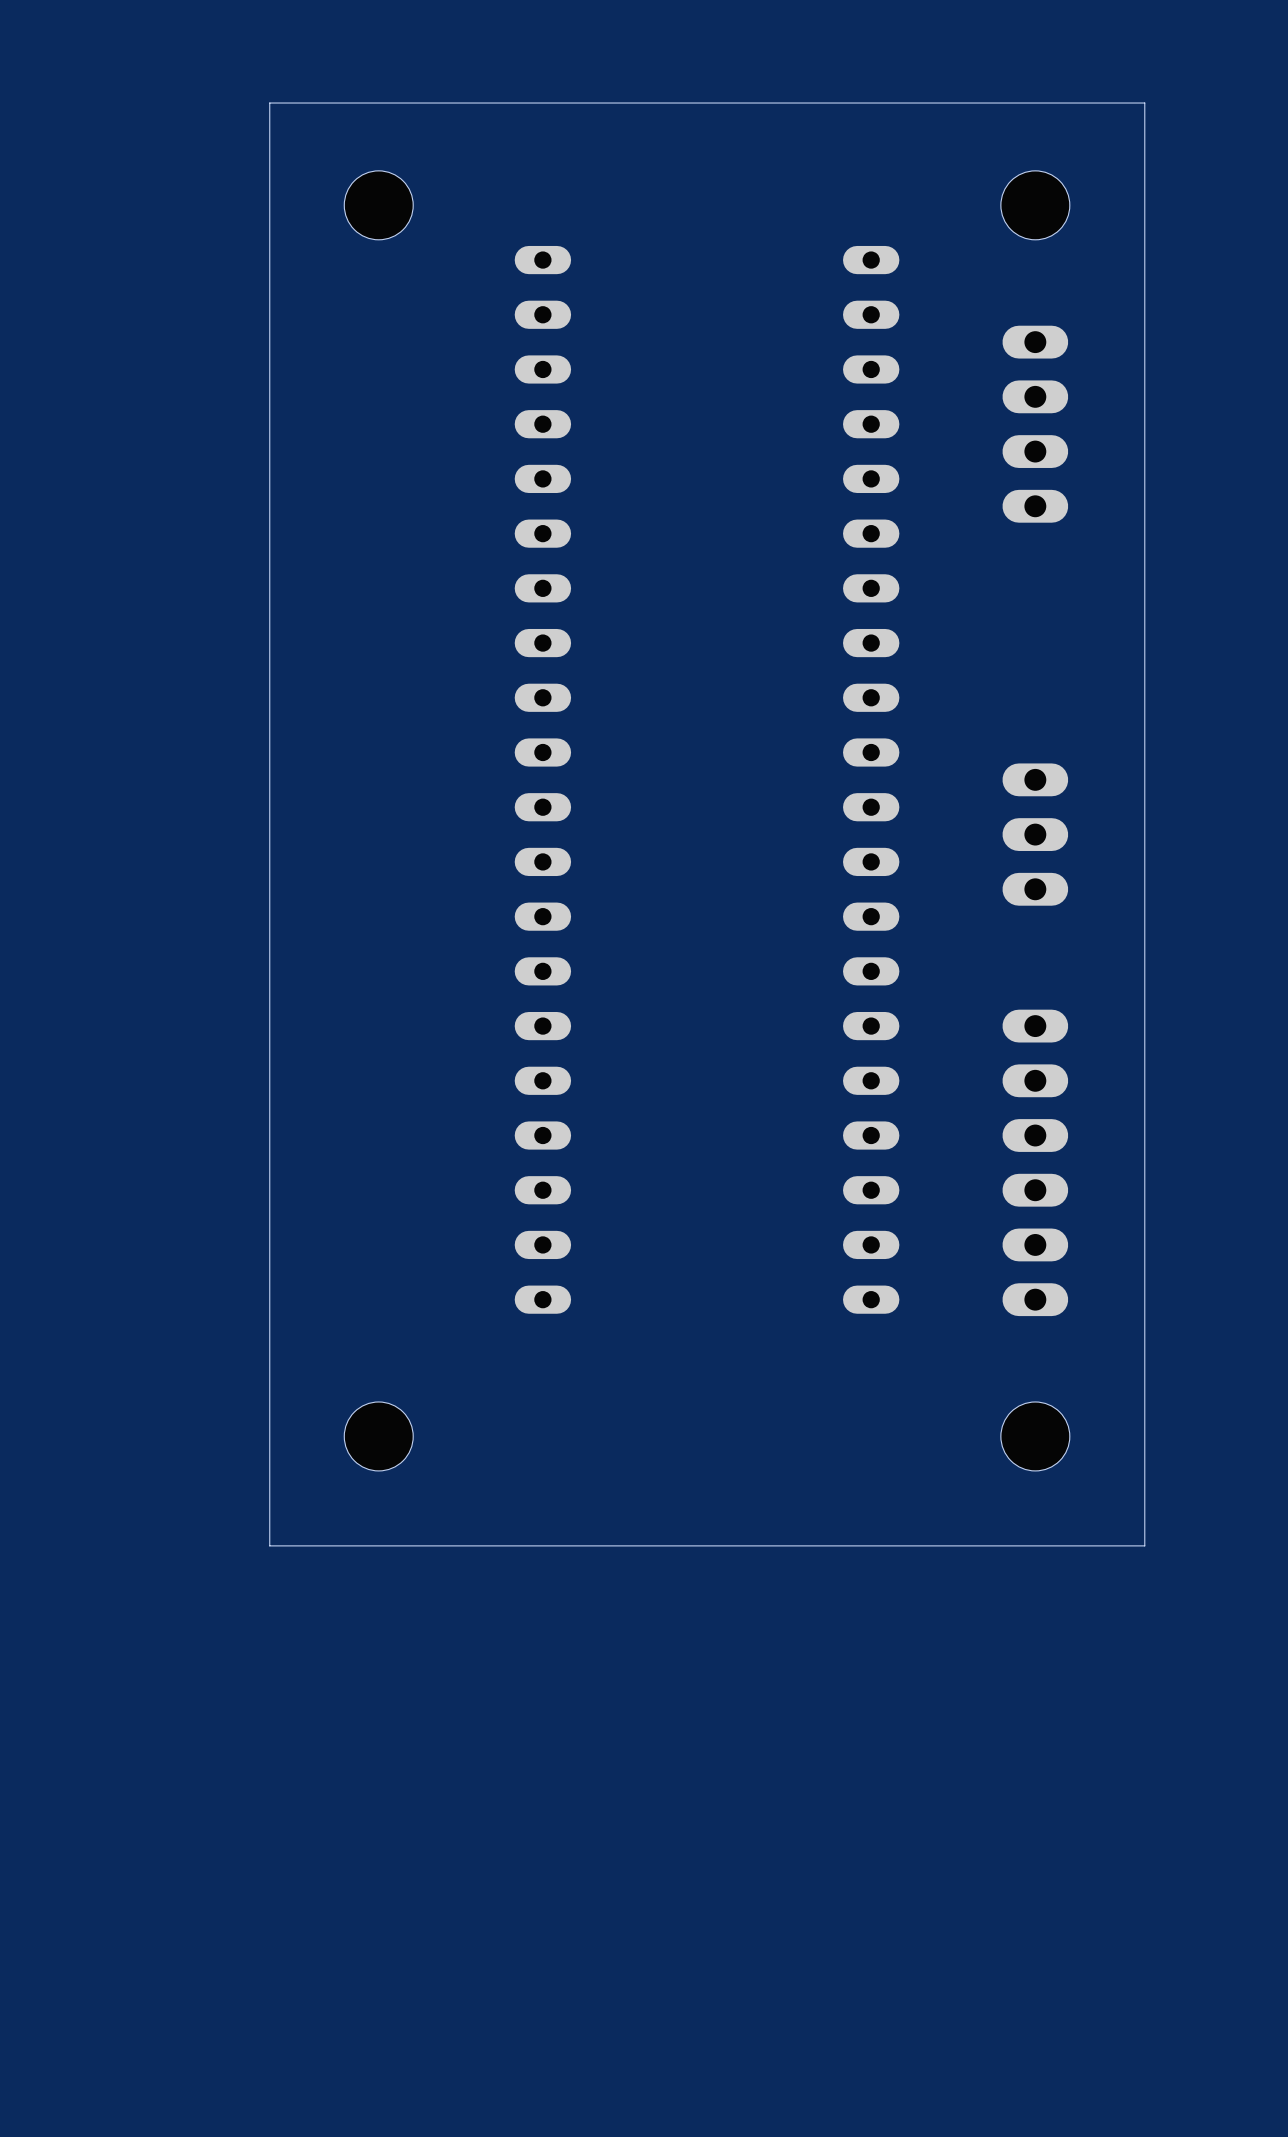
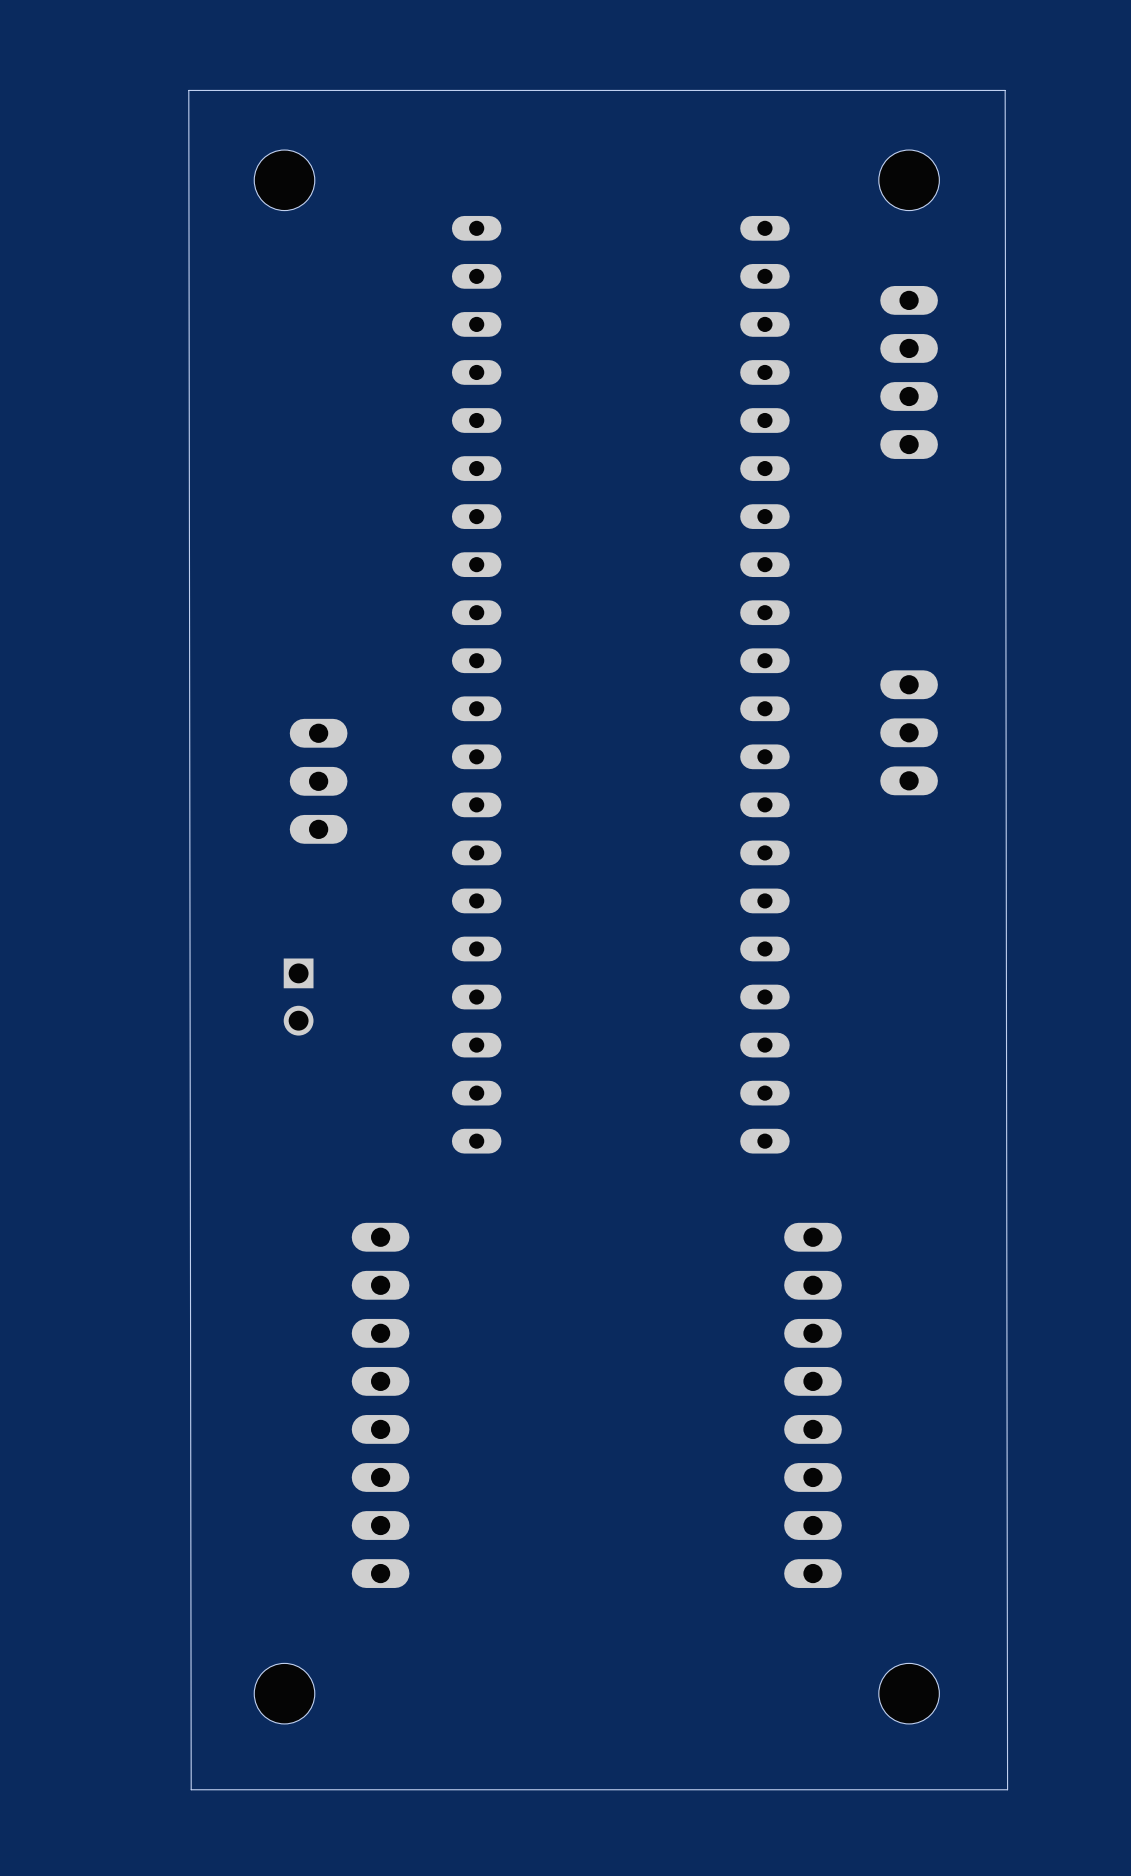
board edge: (1144, 103) (1144, 1545) (269, 1545) (269, 103) -> (1005, 90) (1007, 1789) (191, 1789) (188, 90) (236, 90)
part position: (378, 205) -> (284, 180)
part: none -> (318, 781)
part: none -> (298, 997)
part: (1035, 1162) -> none
part: (378, 1436) -> none
part: (1035, 1436) -> none
part: none -> (380, 1405)
part: none -> (812, 1405)
part: none -> (284, 1693)
part: none -> (909, 1693)

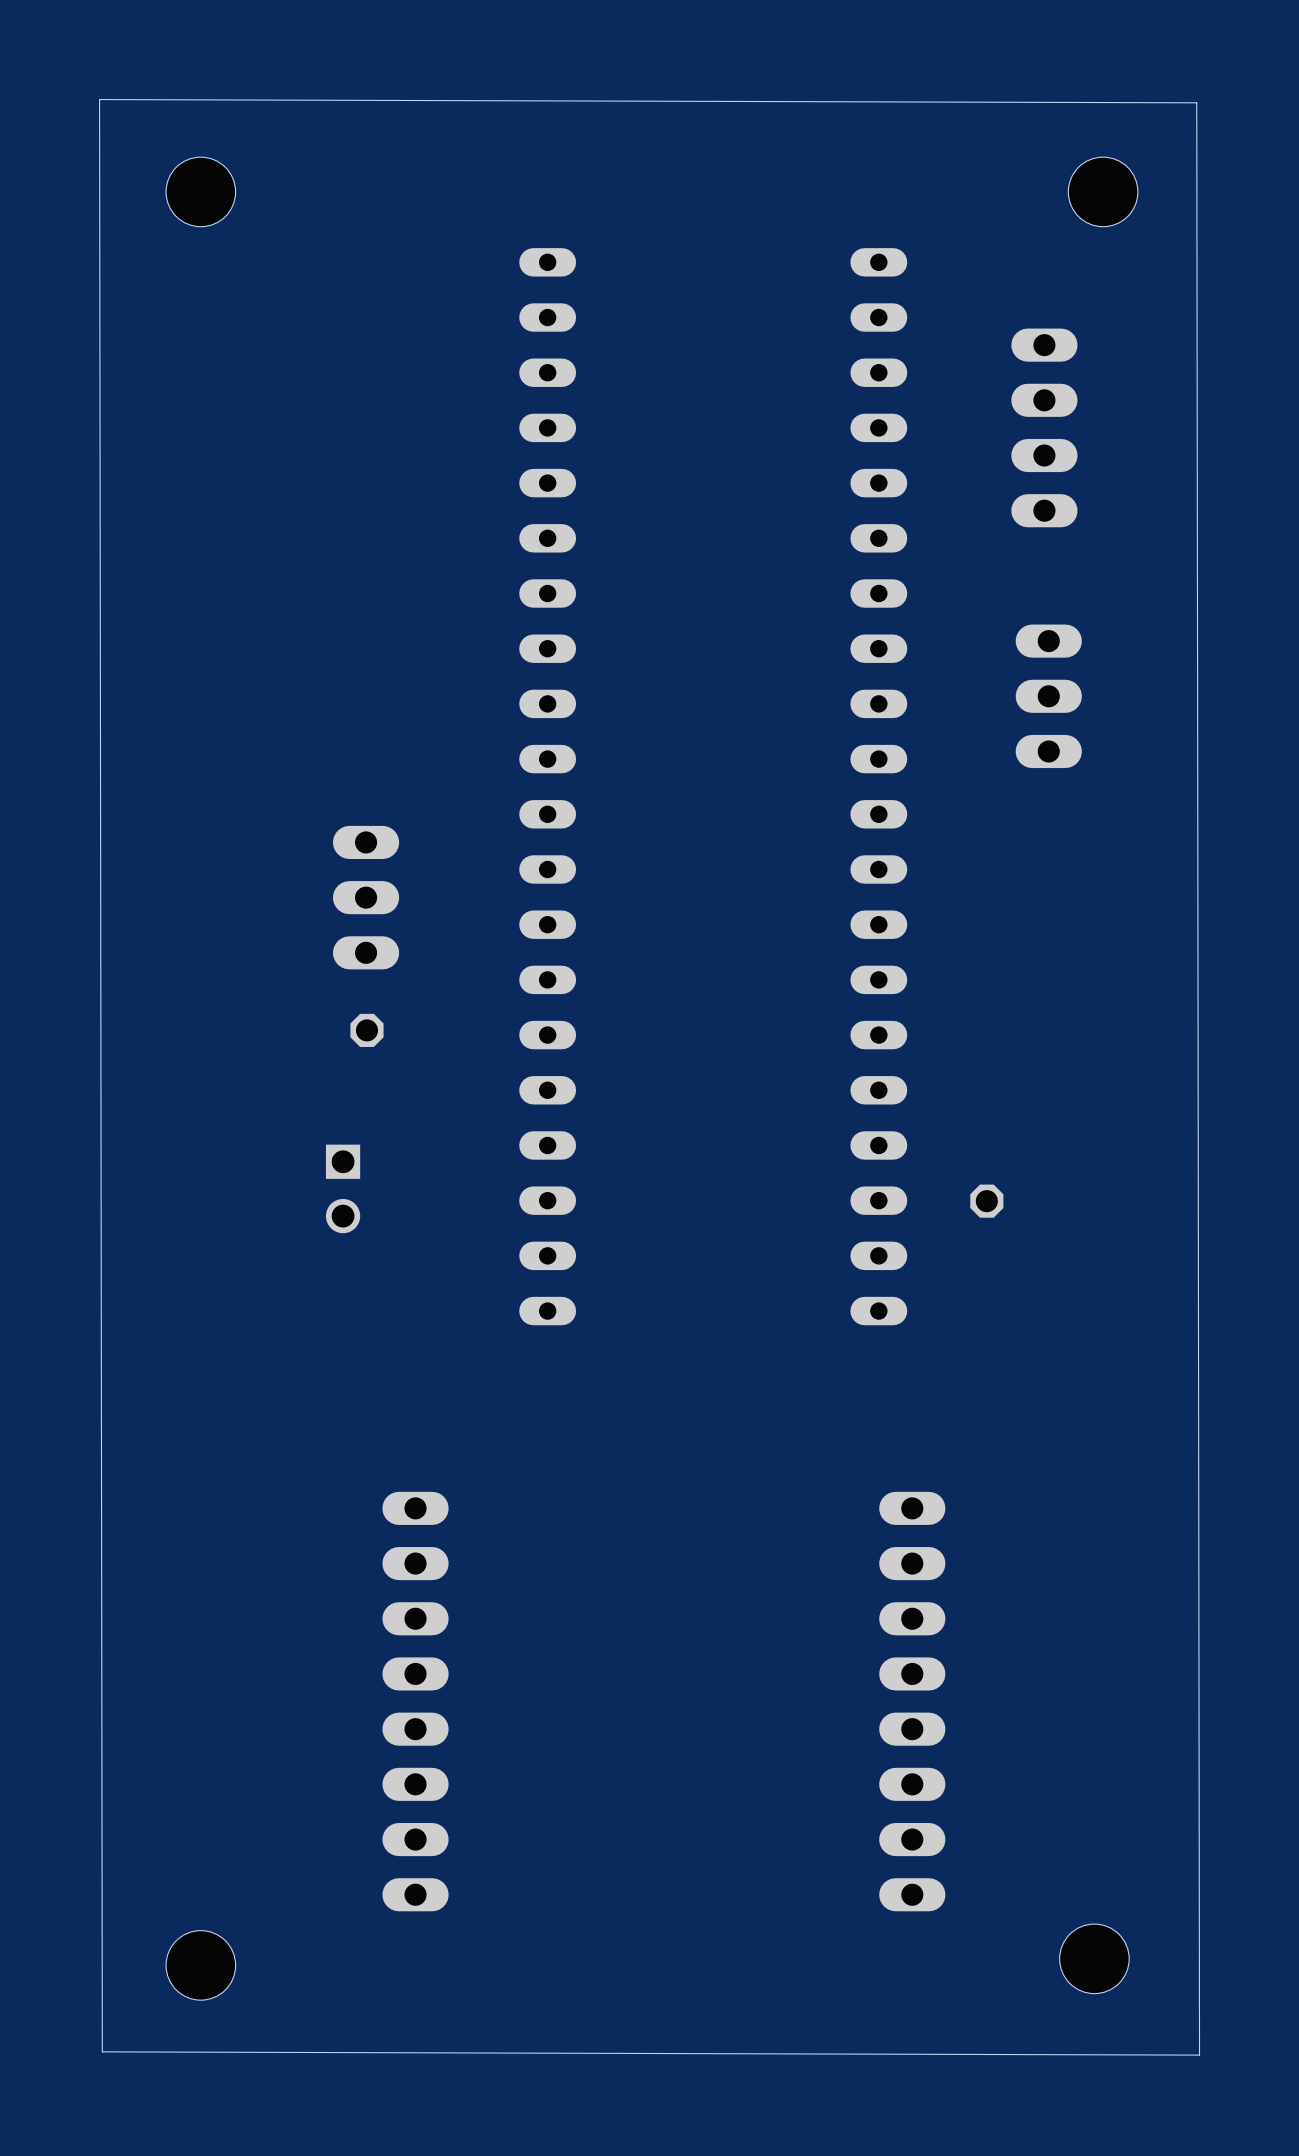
board edge: (1005, 90) (188, 90) (191, 1789) (1007, 1789) (1005, 90) -> (99, 99) (1196, 102) (1199, 2055) (102, 2051) (99, 99)
part position: (284, 180) -> (200, 191)
part position: (909, 180) -> (1103, 191)
part position: (909, 732) -> (1048, 696)
part: none -> (366, 1030)
part position: (298, 997) -> (343, 1188)
part: none -> (986, 1201)
part position: (380, 1405) -> (415, 1701)
part position: (812, 1405) -> (912, 1701)
part position: (284, 1693) -> (200, 1965)
part position: (909, 1693) -> (1094, 1958)

